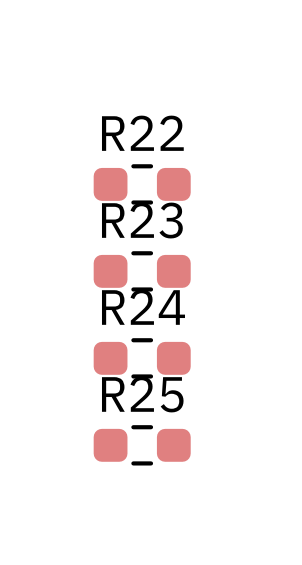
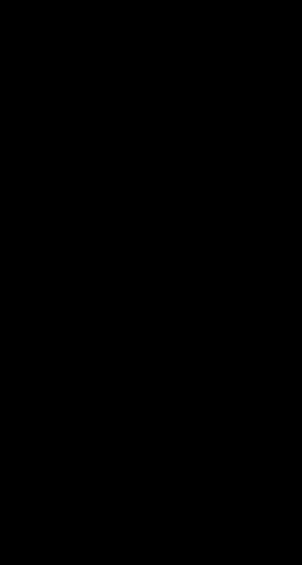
R22: (142, 184) -> none
R23: (142, 271) -> none
R24: (142, 358) -> none
R25: (142, 445) -> none

